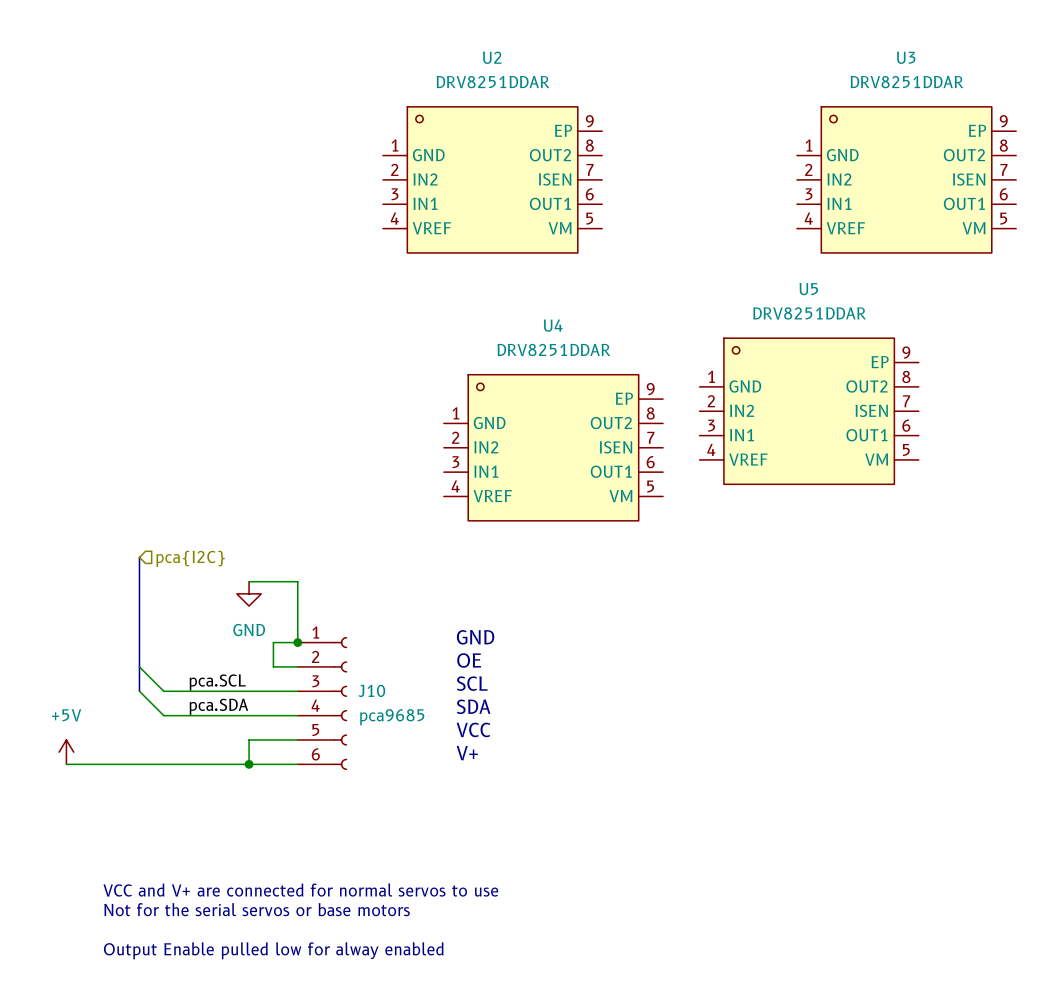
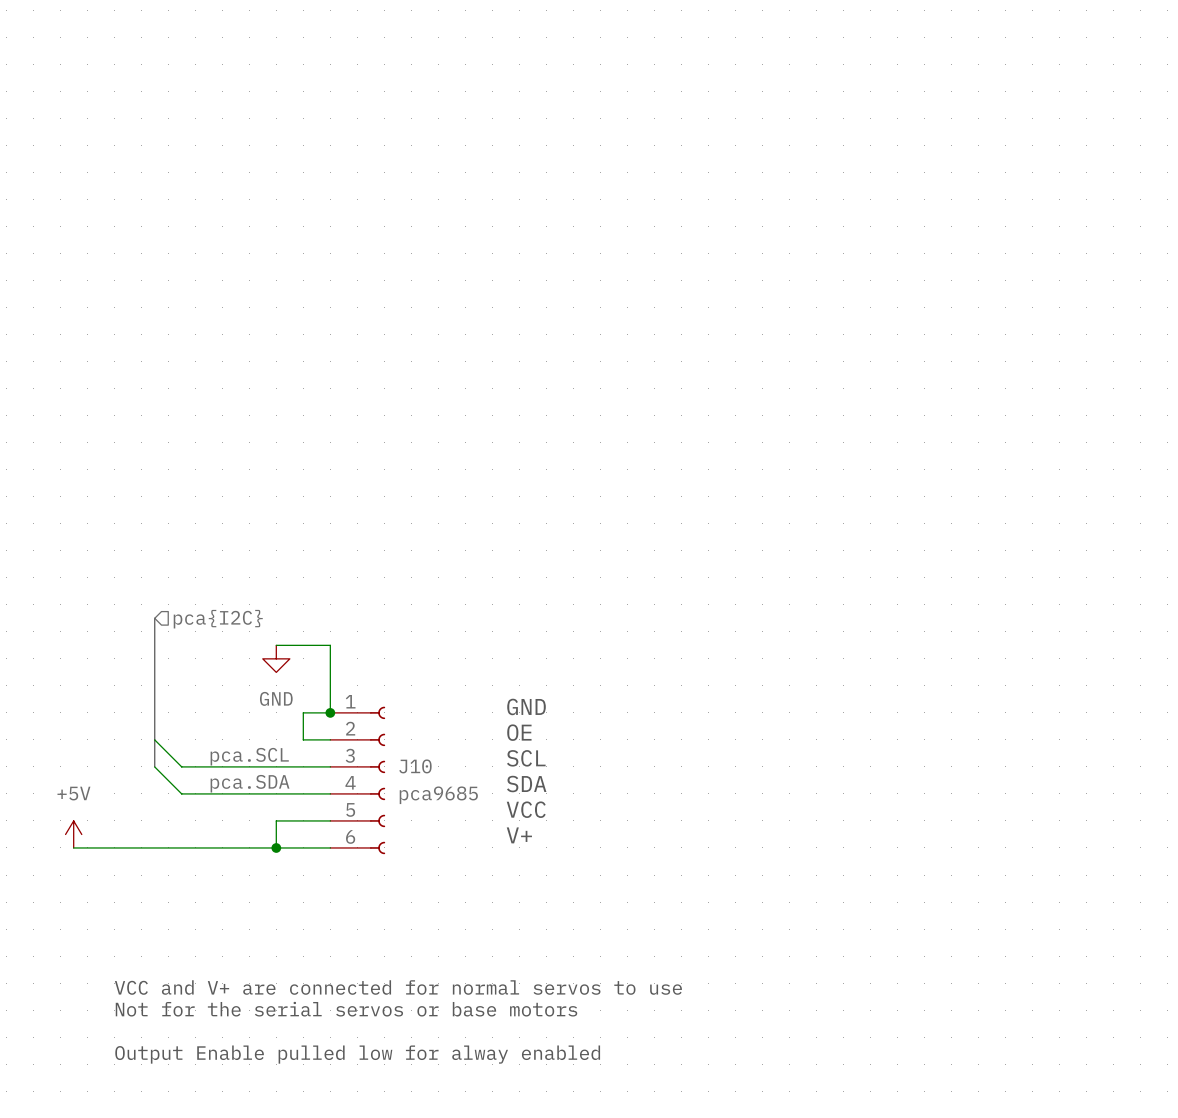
U2: DRV8251DDAR (492, 179) -> none
U3: DRV8251DDAR (906, 179) -> none
U5: DRV8251DDAR (809, 411) -> none
U4: DRV8251DDAR (553, 447) -> none

